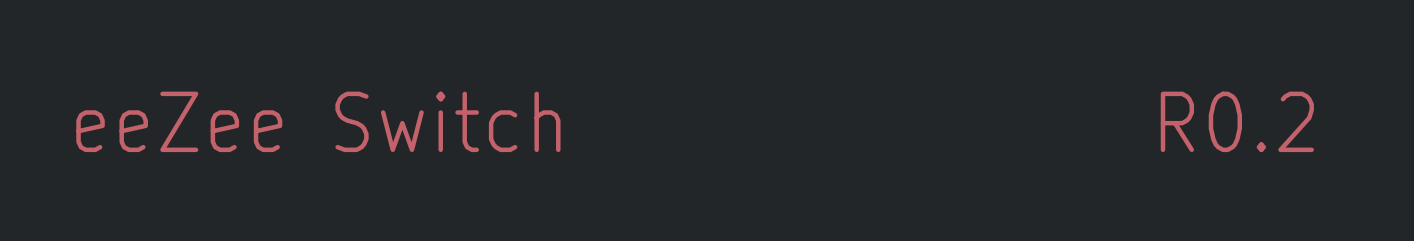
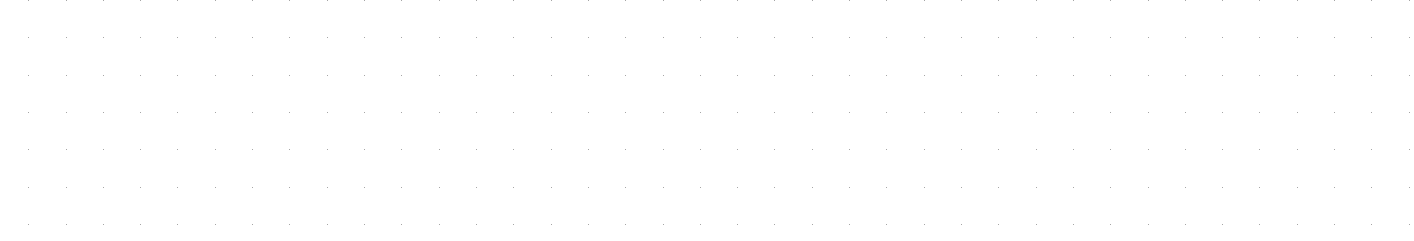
text: eeZee Switch (318, 121) -> none
text: R0.2 (1237, 121) -> none

